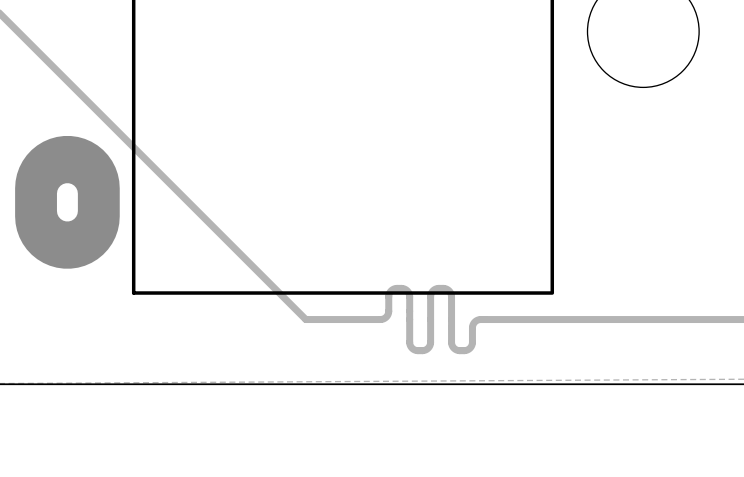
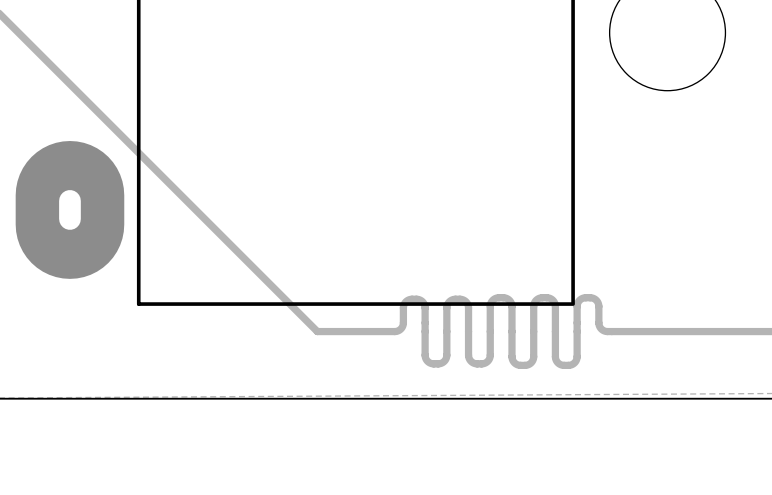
track: (585, 319) (479, 319) (474, 322) (472, 327) -> (607, 331) (602, 329) (599, 325) (596, 301) (591, 297) (581, 299) (577, 305) (576, 359) (571, 364) (560, 364) (555, 357) (554, 303) (549, 298) (539, 298) (533, 305) (533, 359) (527, 364) (517, 364) (512, 357) (511, 303) (507, 298) (497, 297) (492, 300) (490, 304) (490, 340)

